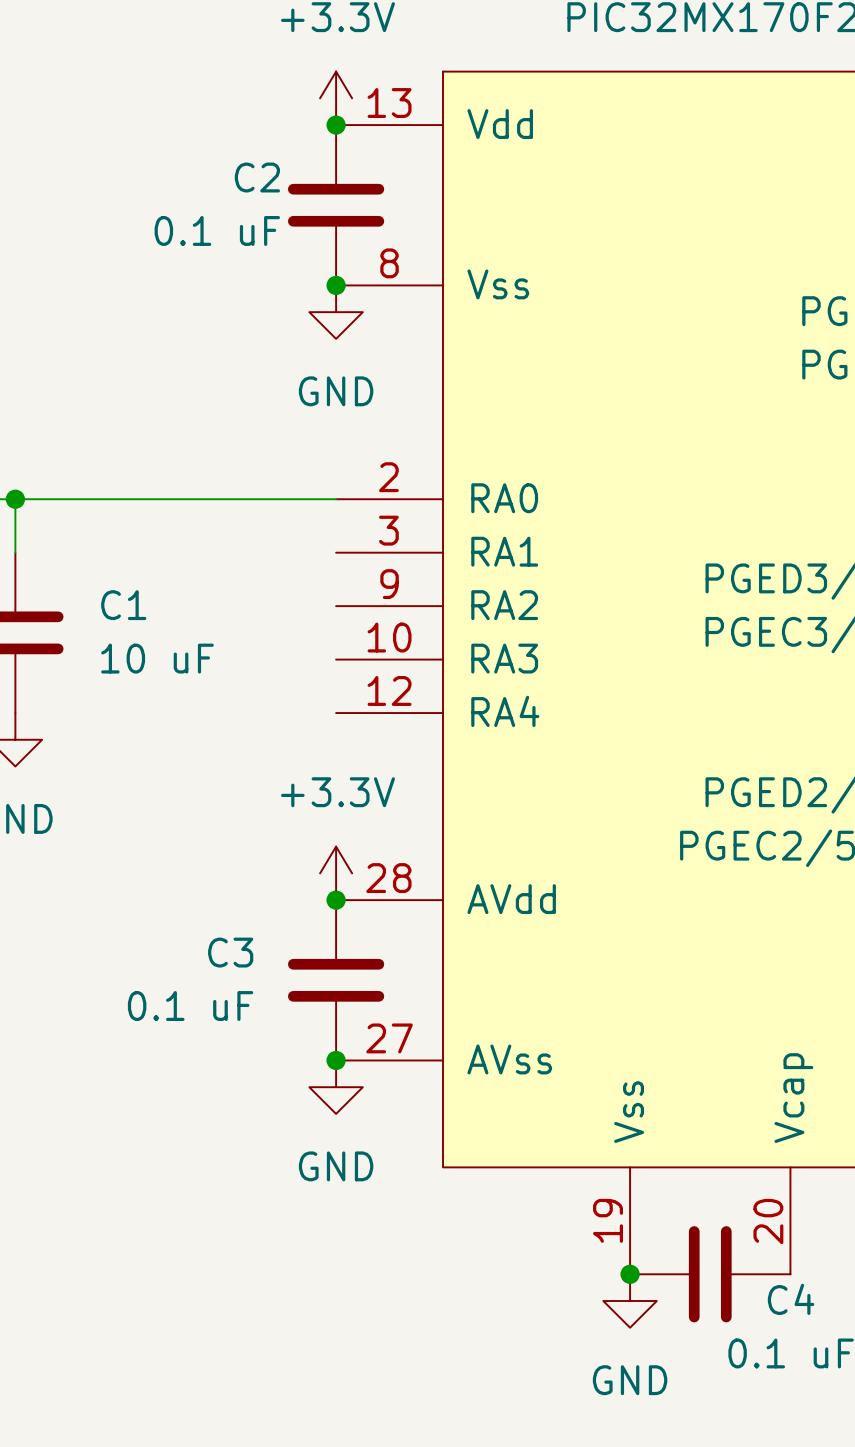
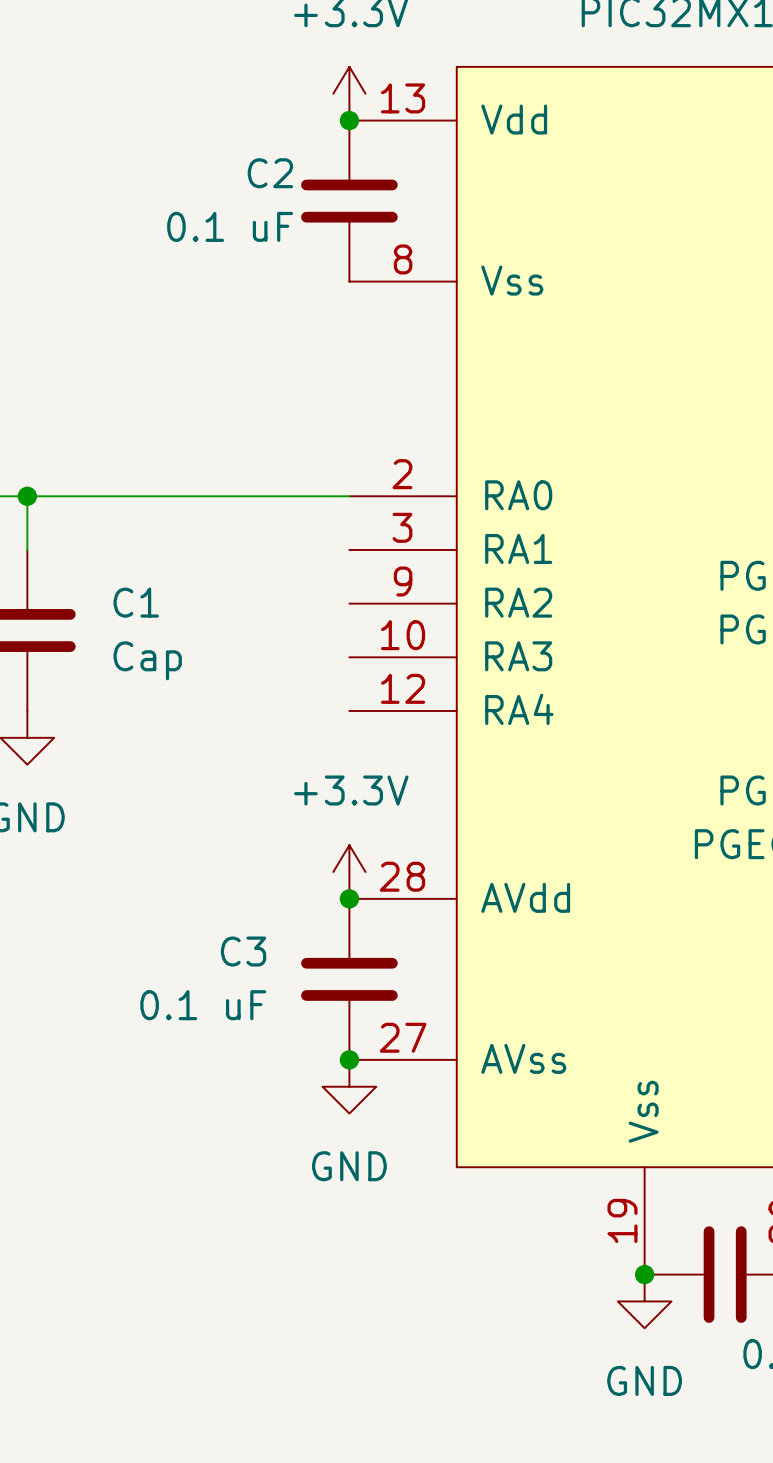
junction: (336, 285) -> none
power symbol: GND (336, 312) -> none
C1 value: 10 uF (157, 658) -> Cap (147, 660)

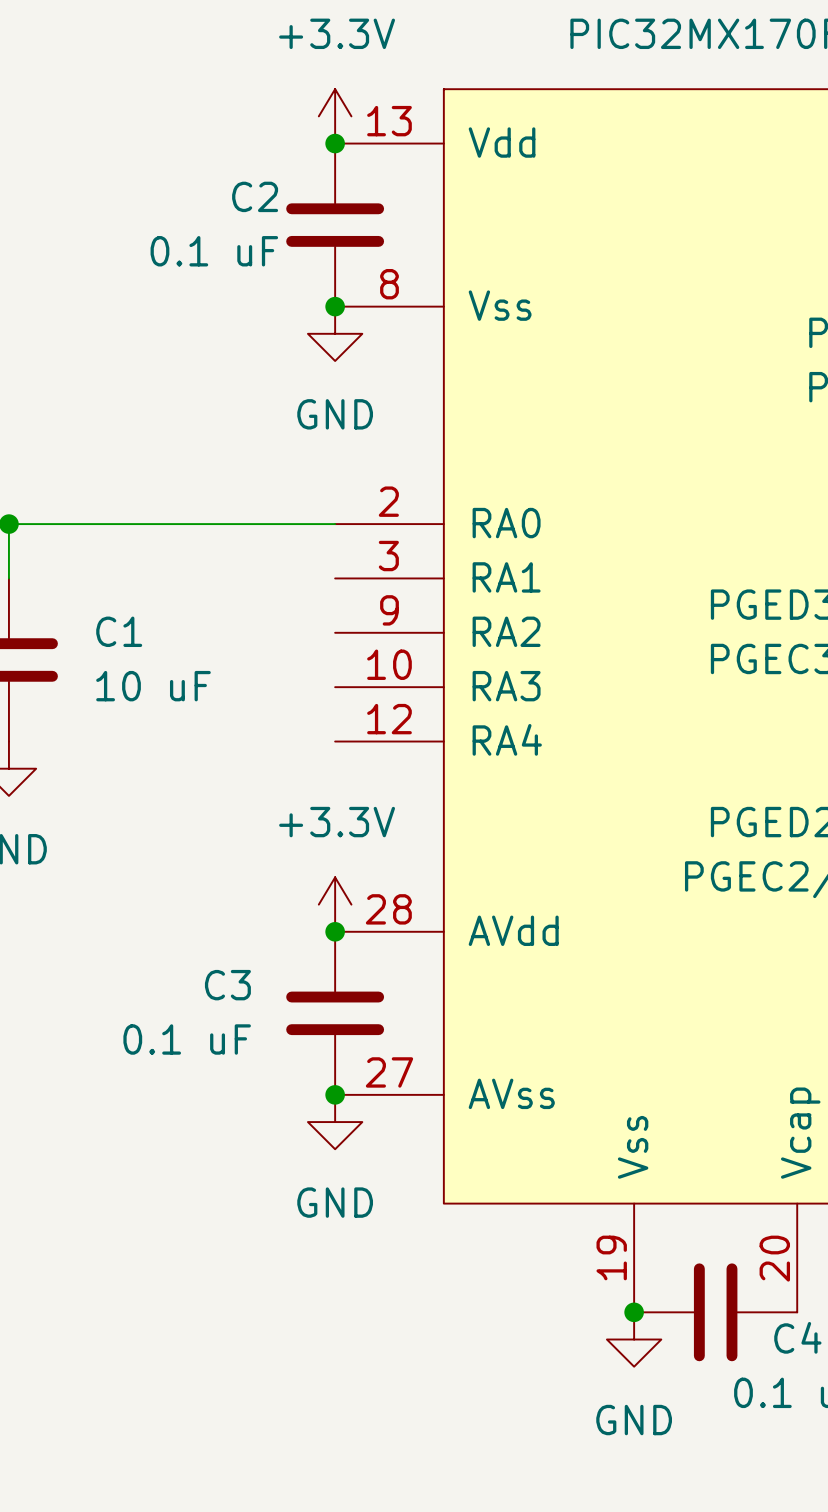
junction: none -> (335, 306)
power symbol: none -> GND (335, 333)
C1 value: Cap (147, 660) -> 10 uF (153, 686)

